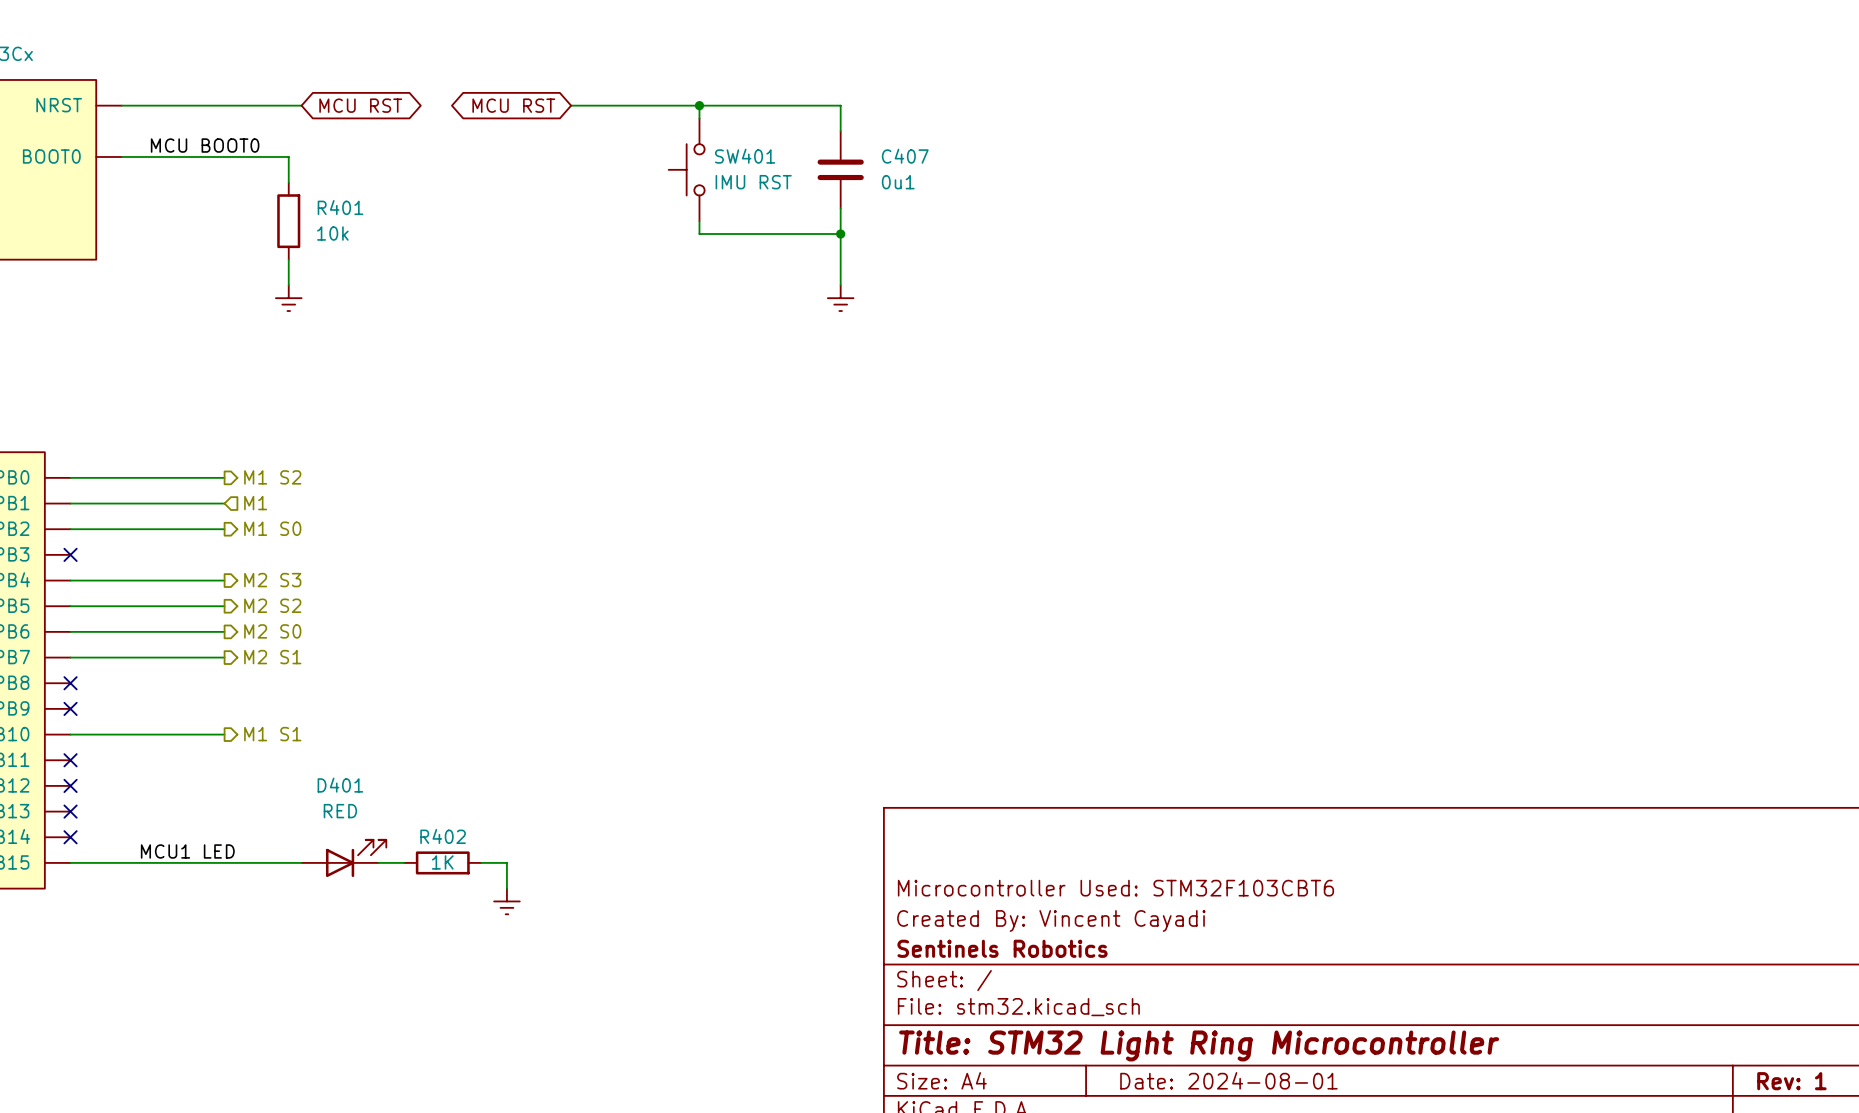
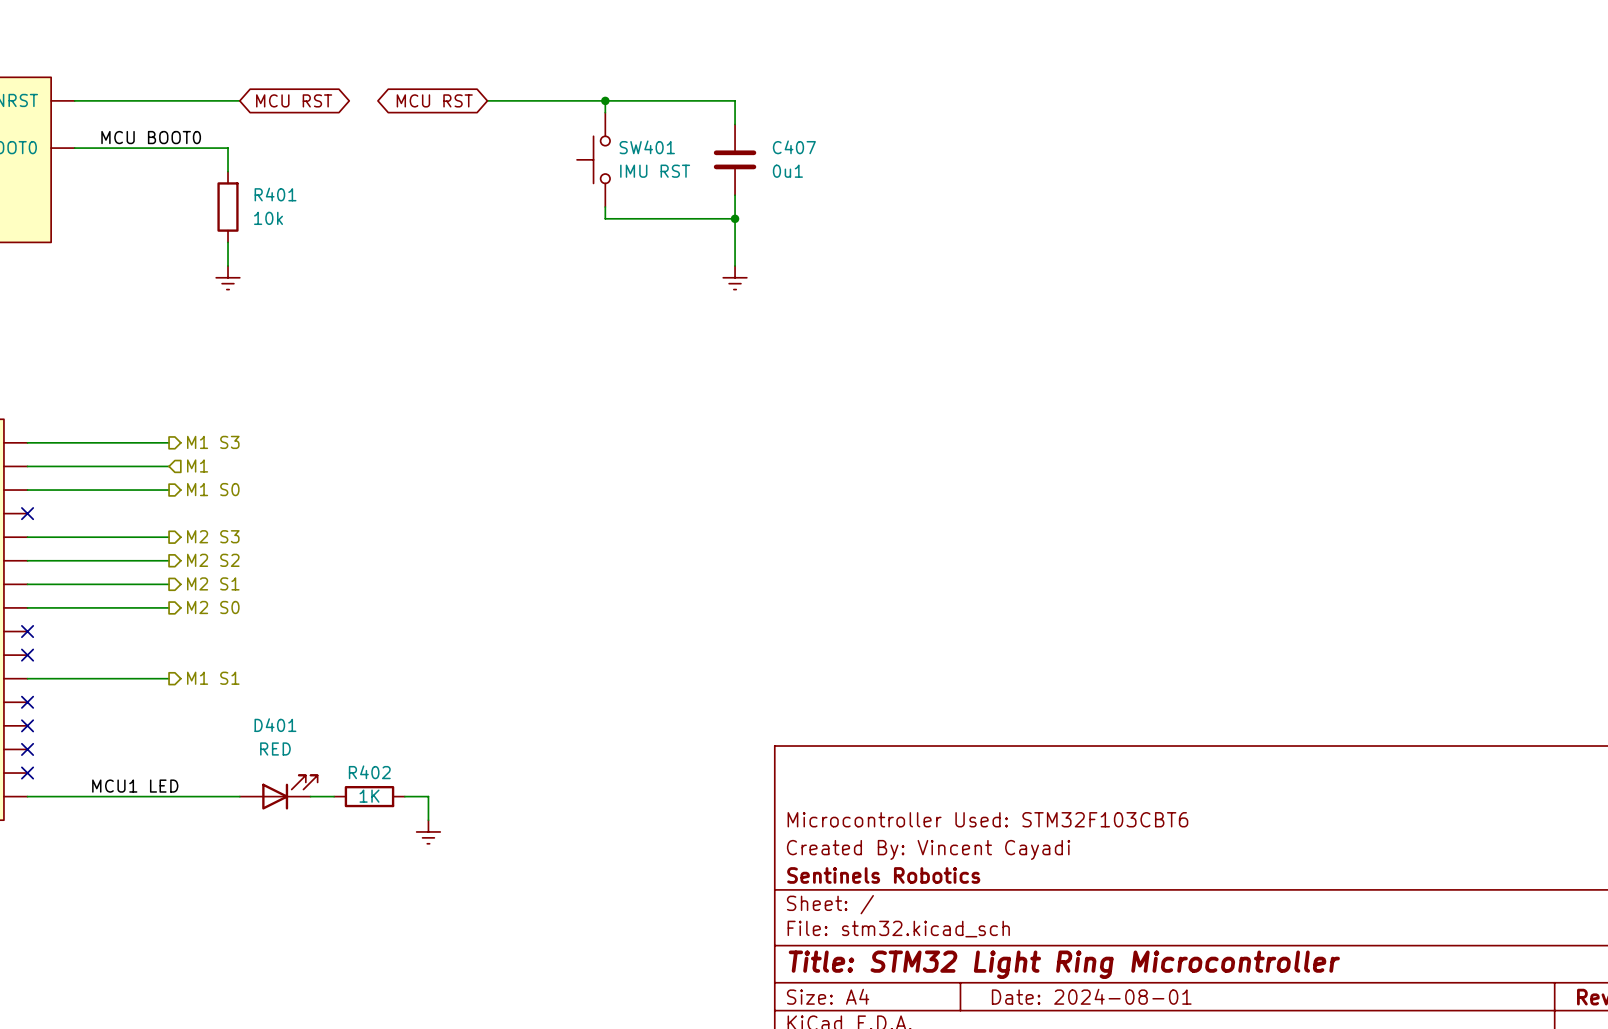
hierarchical label: M1 S2 (272, 477) -> M1 S3 (213, 442)
hierarchical label: M2 S0 (272, 631) -> M2 S1 (213, 583)
hierarchical label: M2 S1 (272, 657) -> M2 S0 (213, 607)

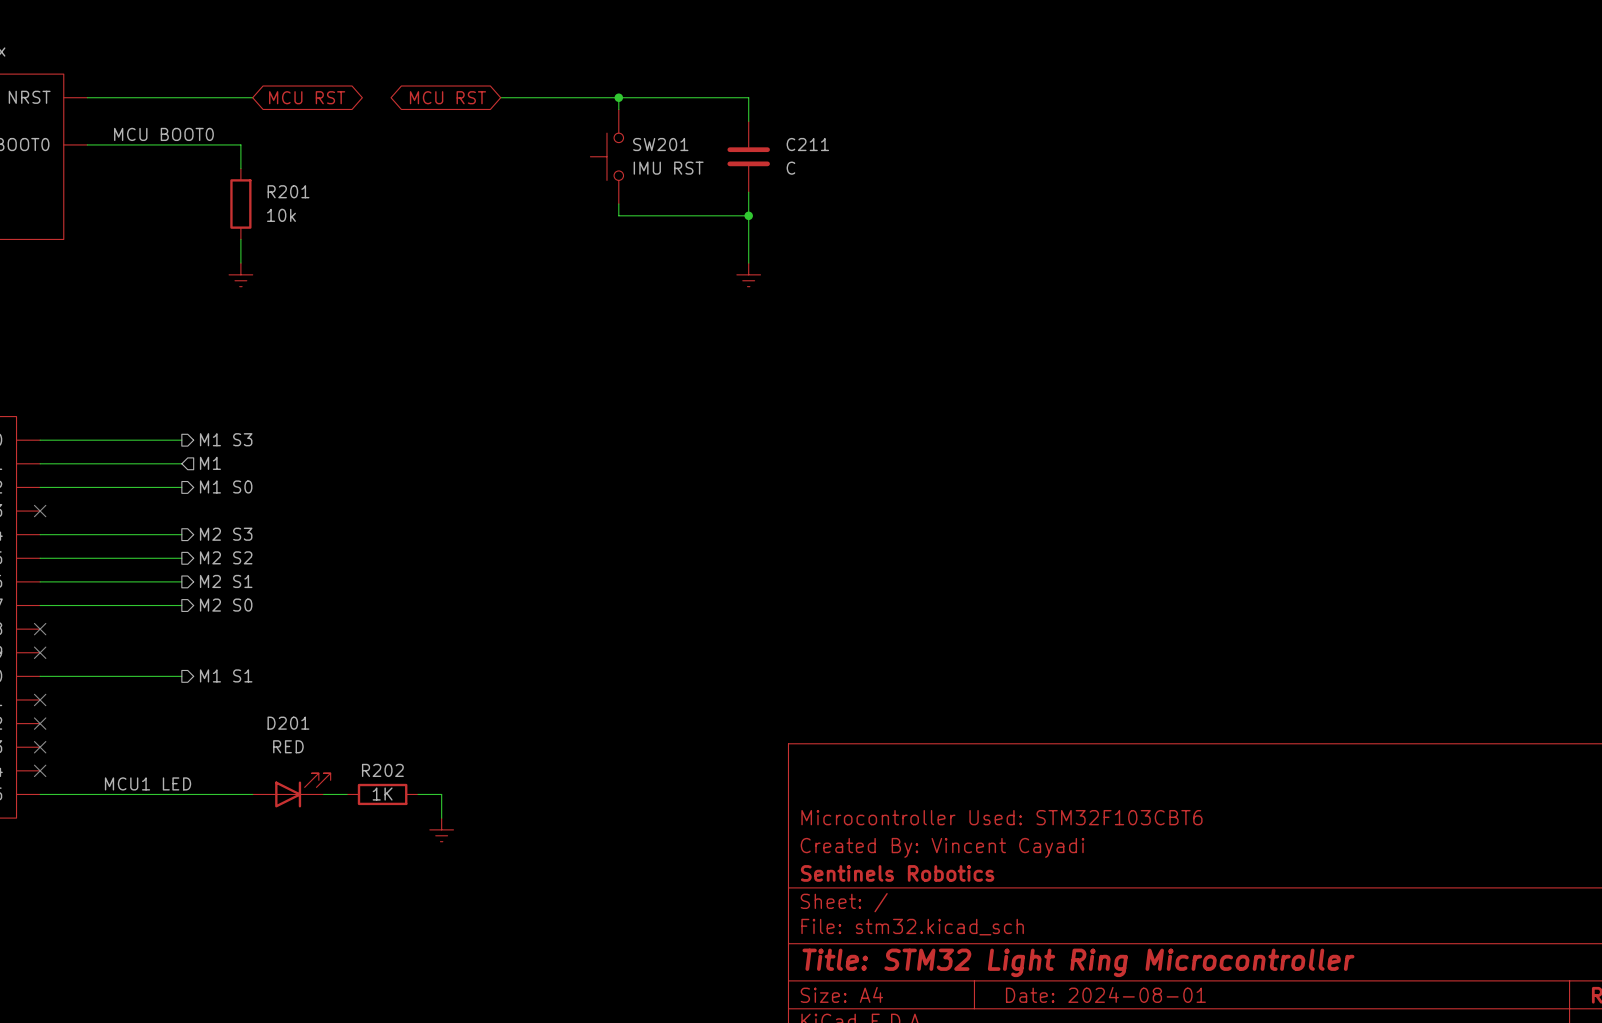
SW401 name: SW401 (647, 147) -> SW201 (660, 144)
C407 name: C407 (794, 147) -> C211 (807, 144)
C407 value: 0u1 (787, 171) -> C (790, 168)
R401 name: R401 (275, 194) -> R201 (288, 191)
D401 name: D401 (275, 725) -> D201 (288, 723)
R402 name: R402 (369, 772) -> R202 (382, 770)

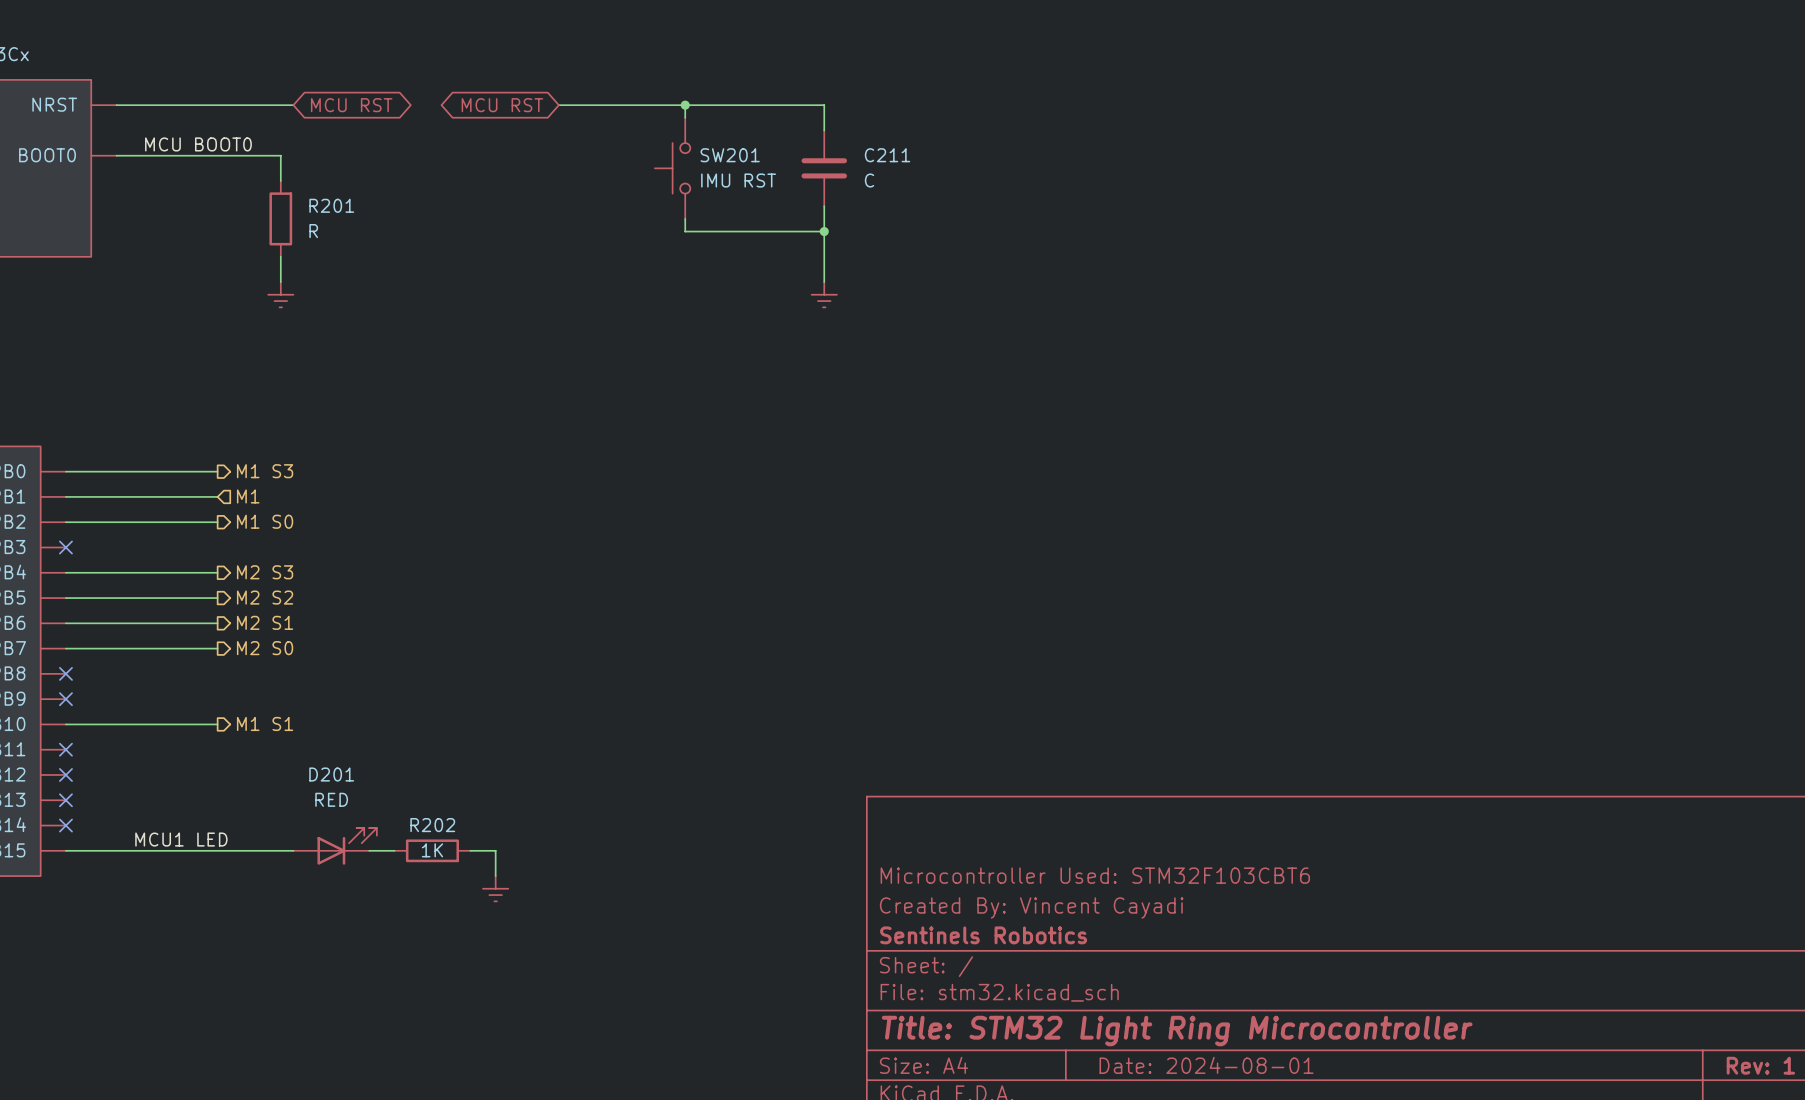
R201 value: 10k (281, 215) -> R (313, 231)

